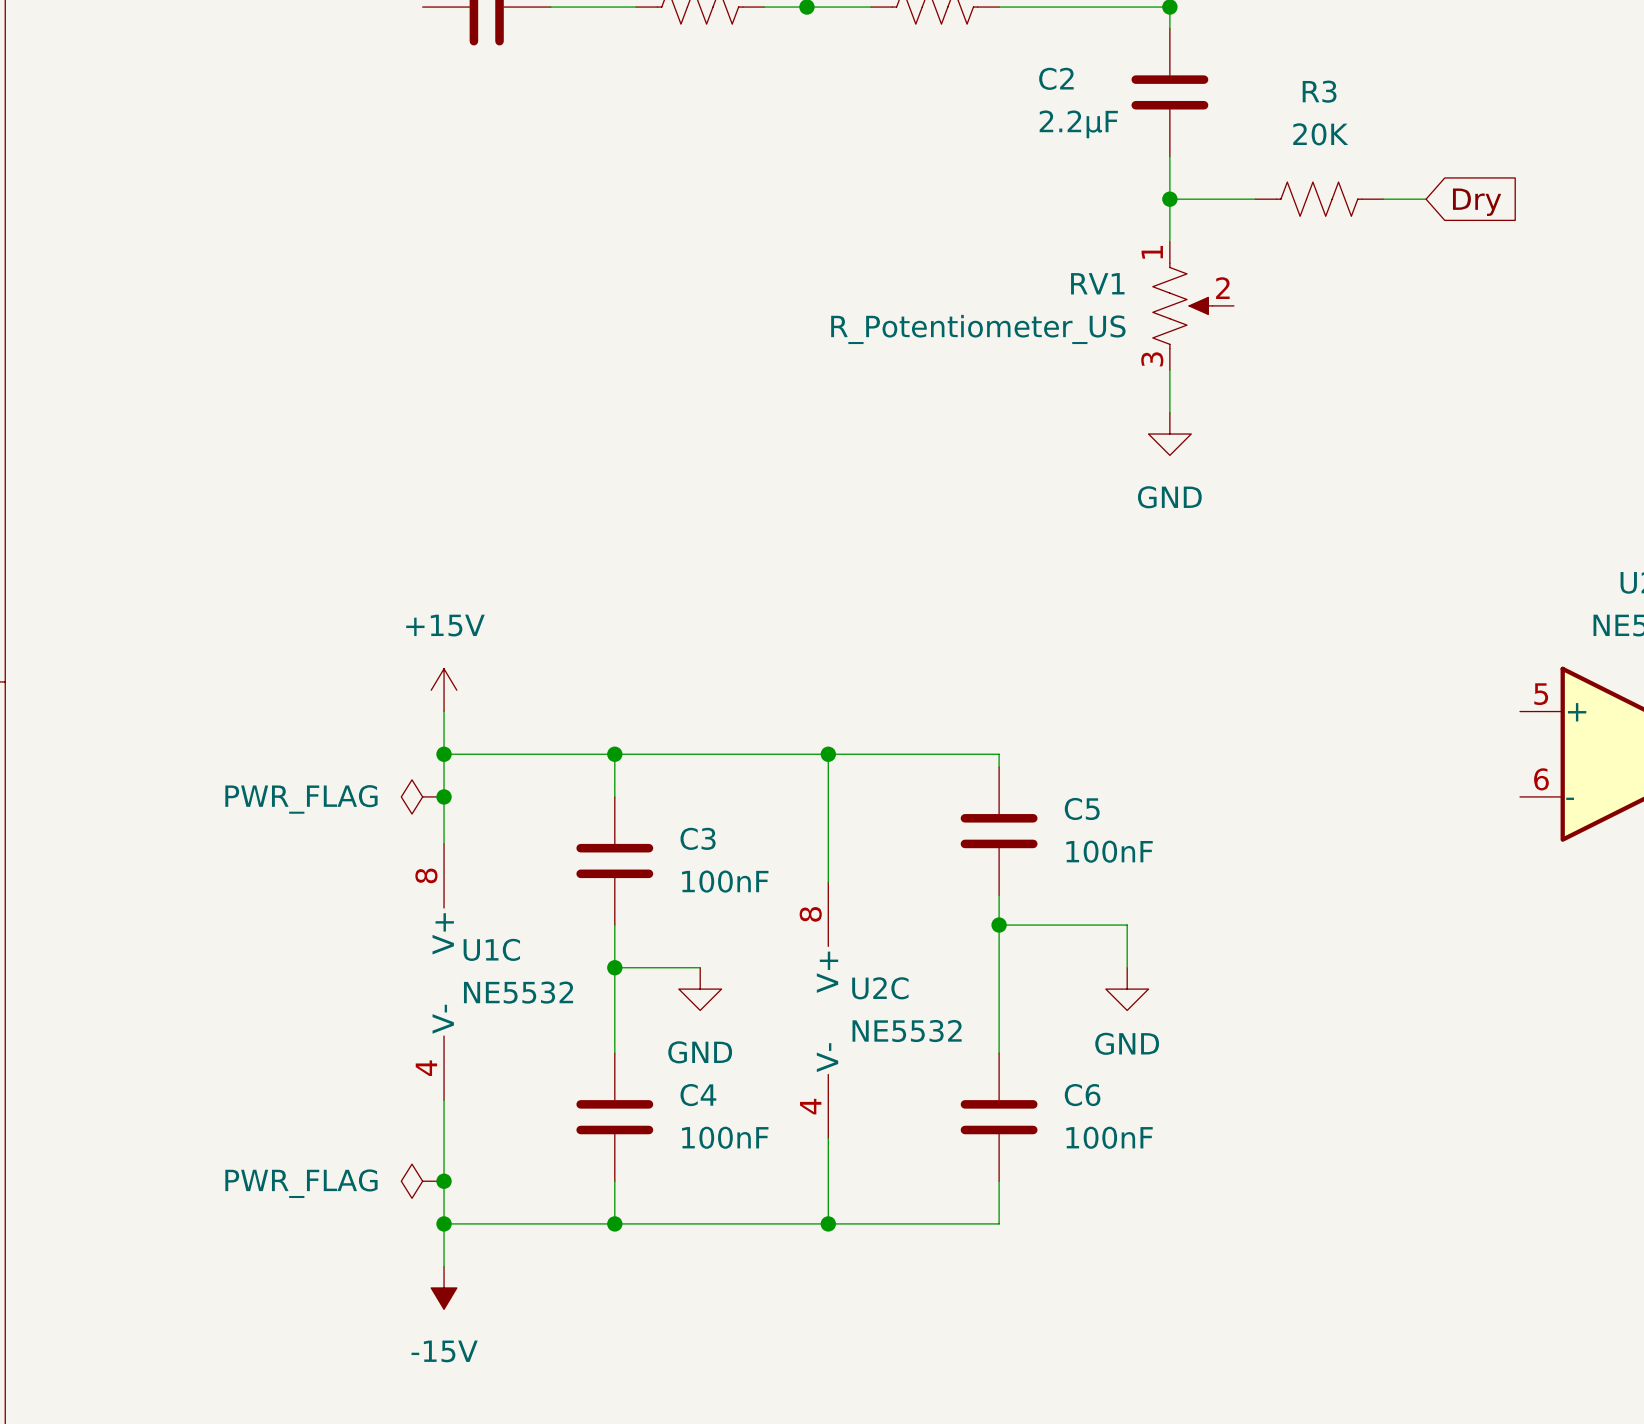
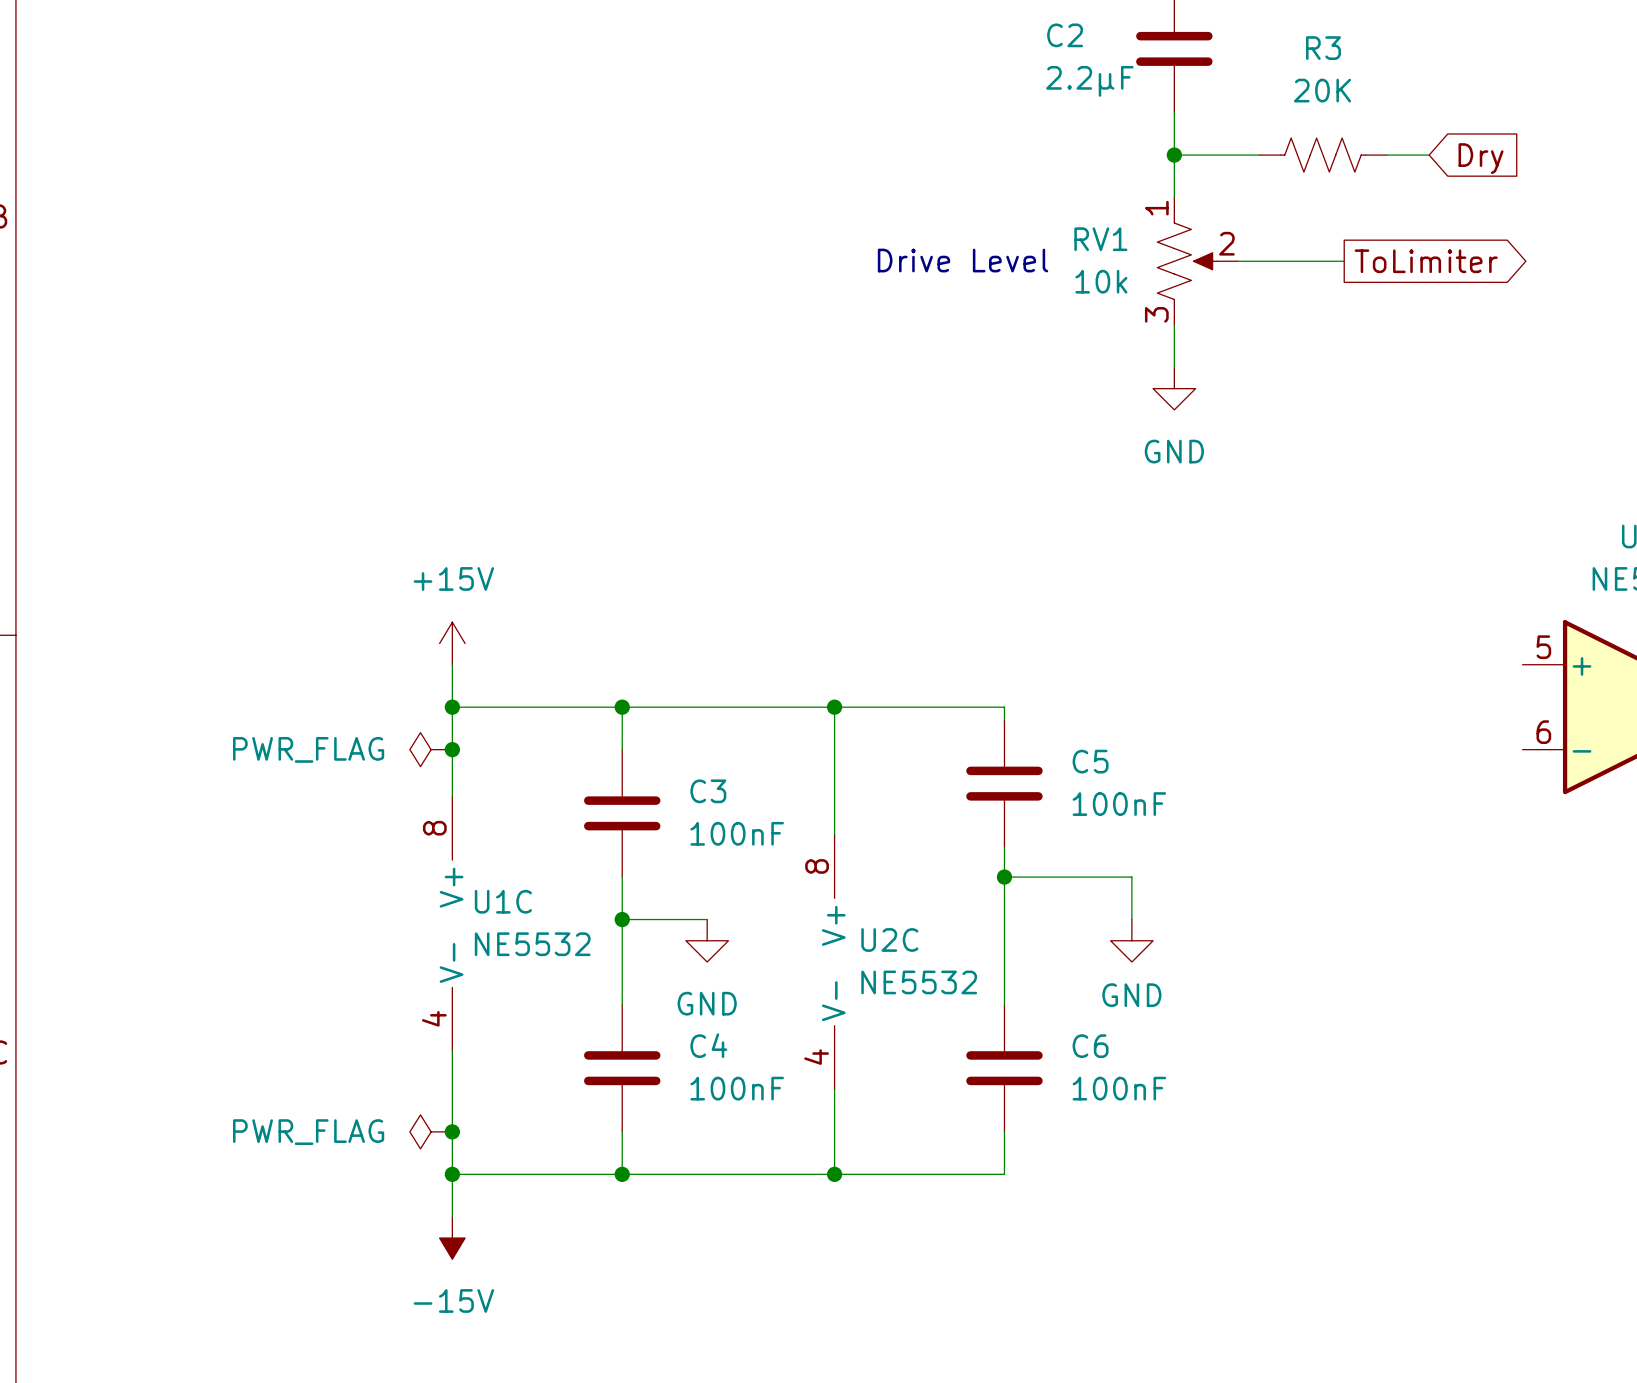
text: none -> Drive Level (963, 260)
wire: none -> (1238, 261) (1344, 261)
global label: none -> ToLimiter (1426, 261)
RV1 value: R_Potentiometer_US (978, 329) -> 10k (1101, 281)

